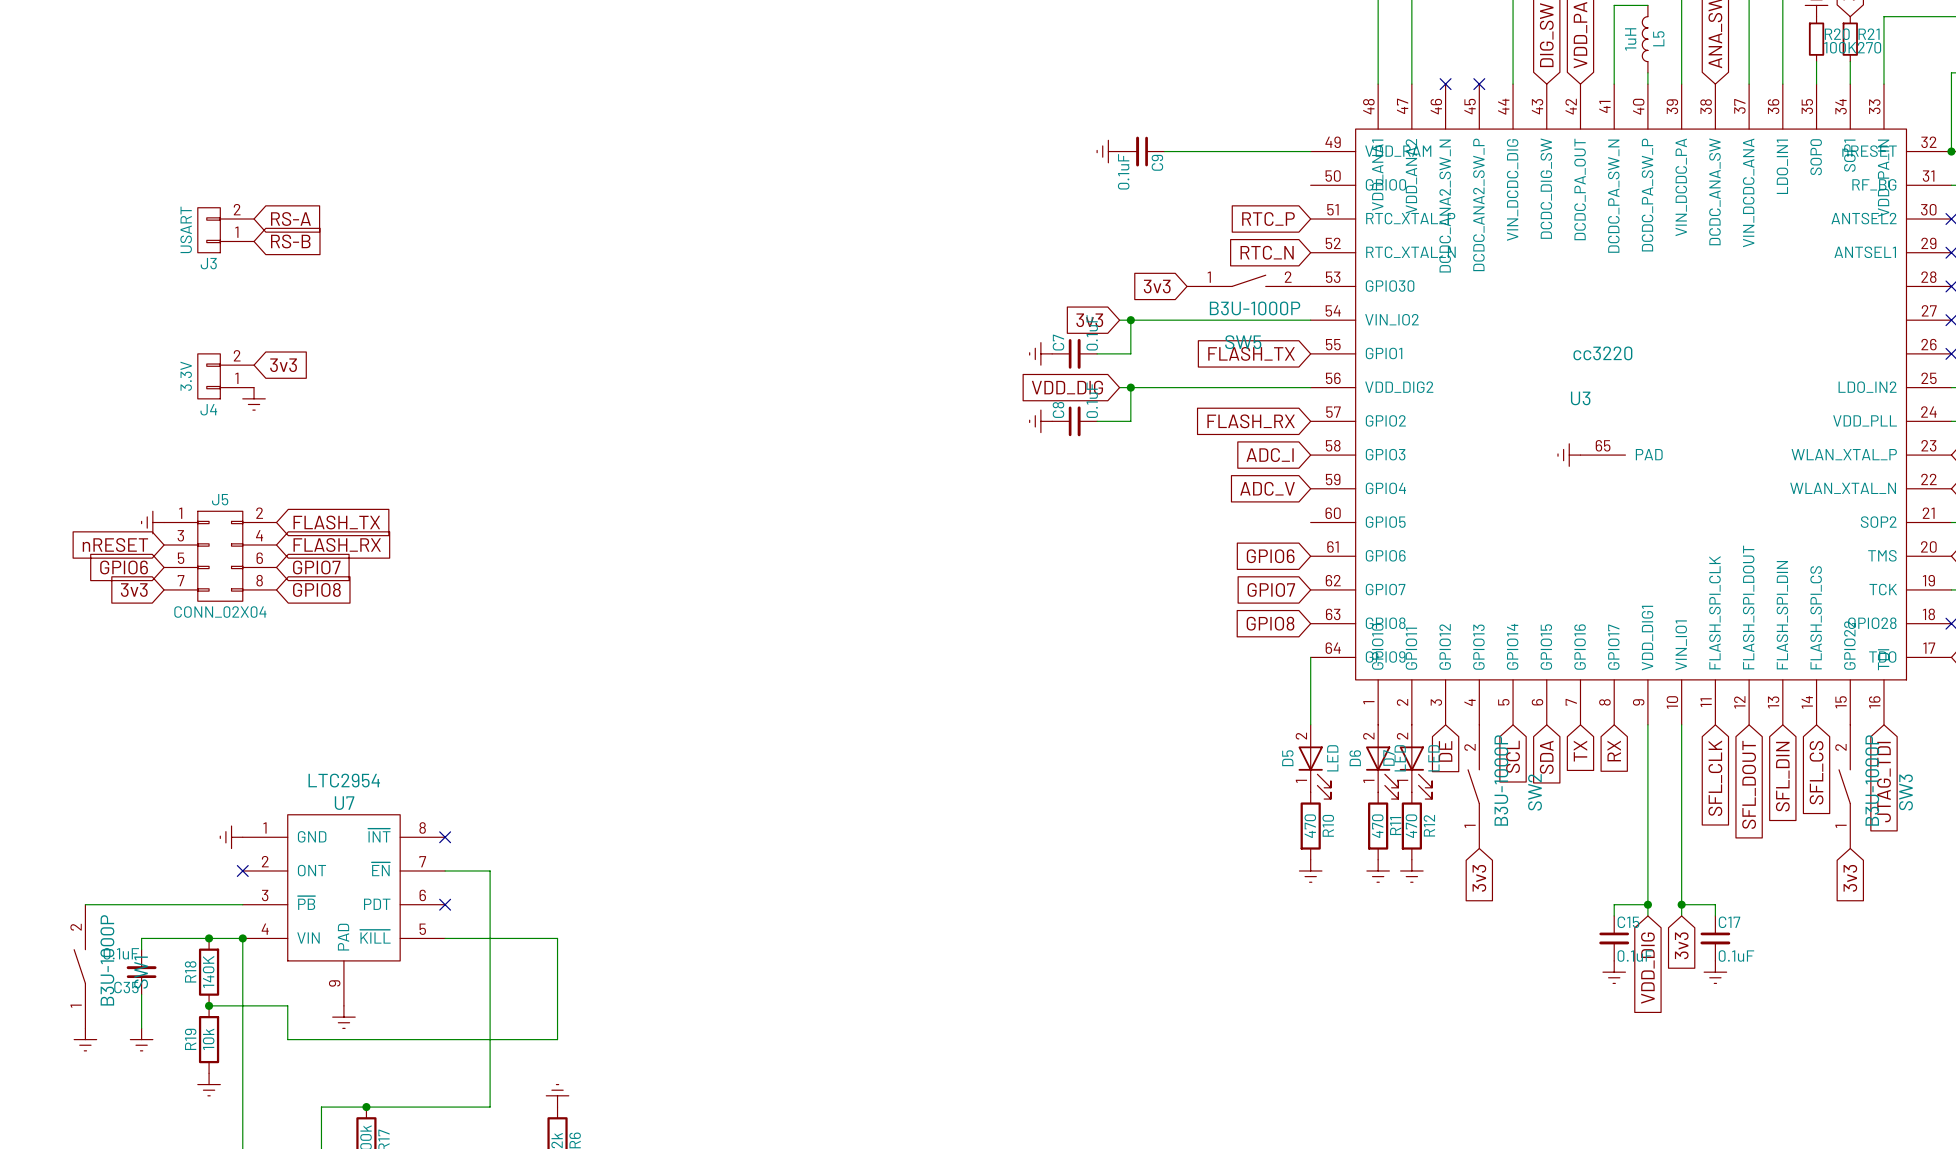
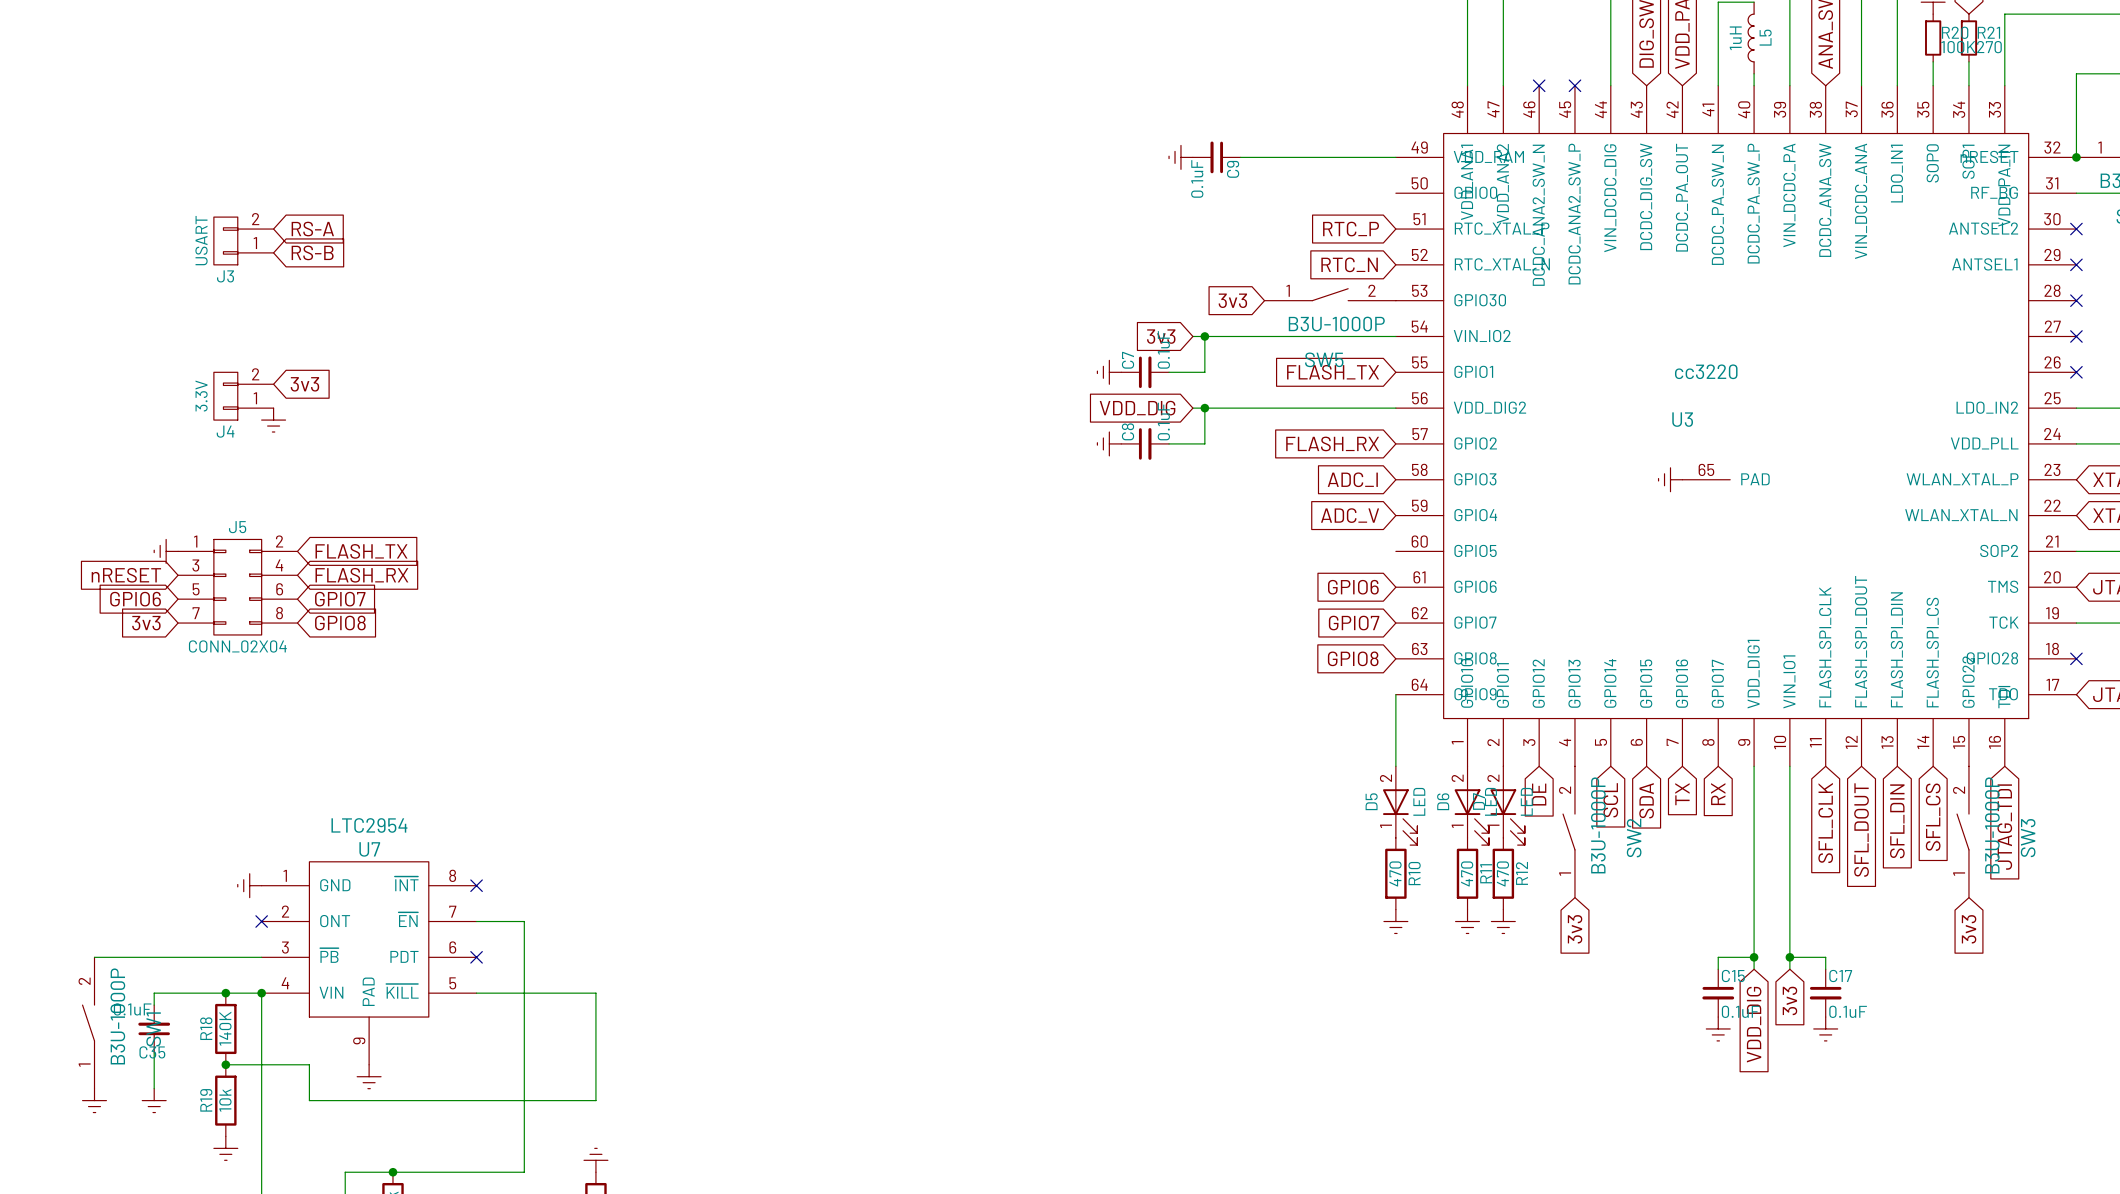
C35 name position: C35 (126, 987) -> C35 (152, 1052)

